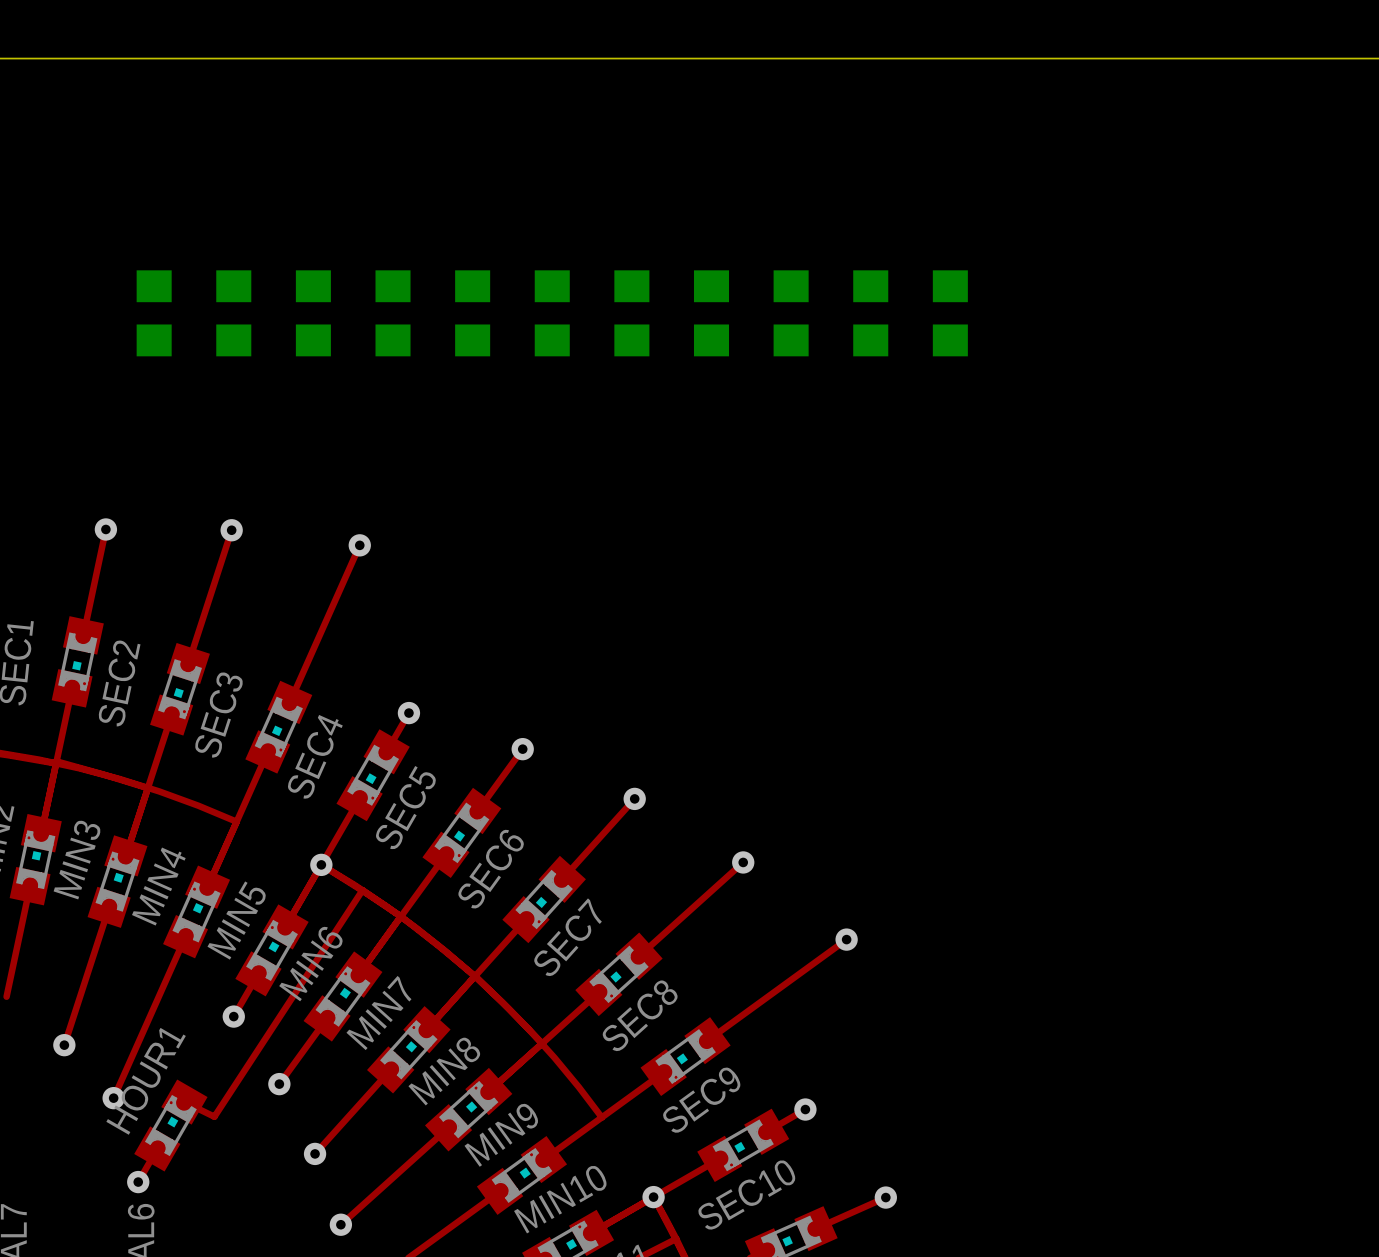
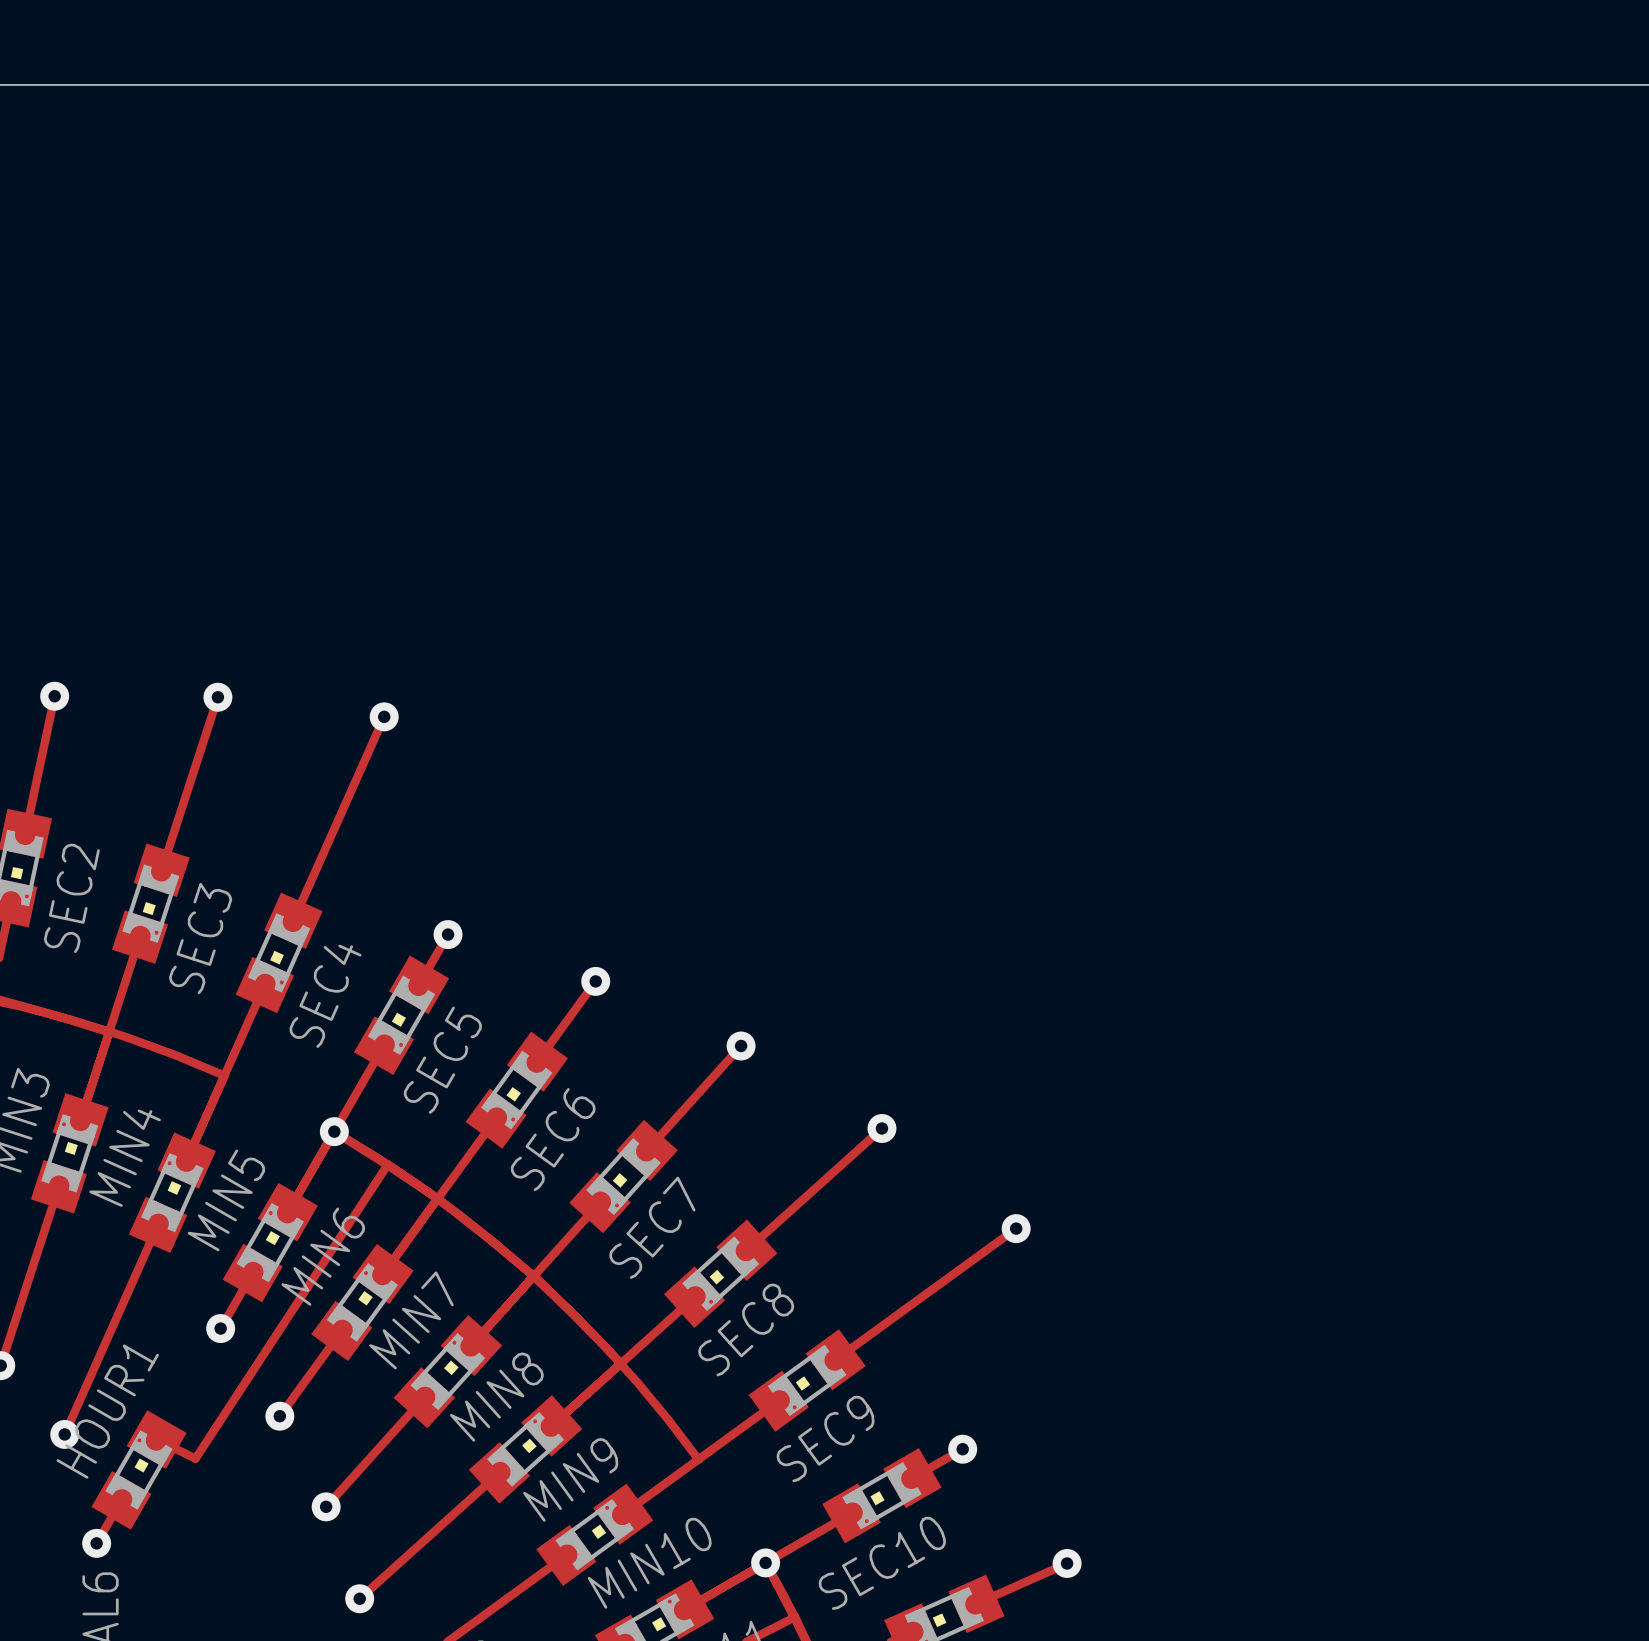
part: (154, 313) -> none
part: (233, 313) -> none
part: (313, 313) -> none
part: (393, 313) -> none
part: (472, 313) -> none
part: (552, 313) -> none
part: (631, 313) -> none
part: (711, 313) -> none
part: (791, 313) -> none
part: (870, 313) -> none
part: (950, 313) -> none

